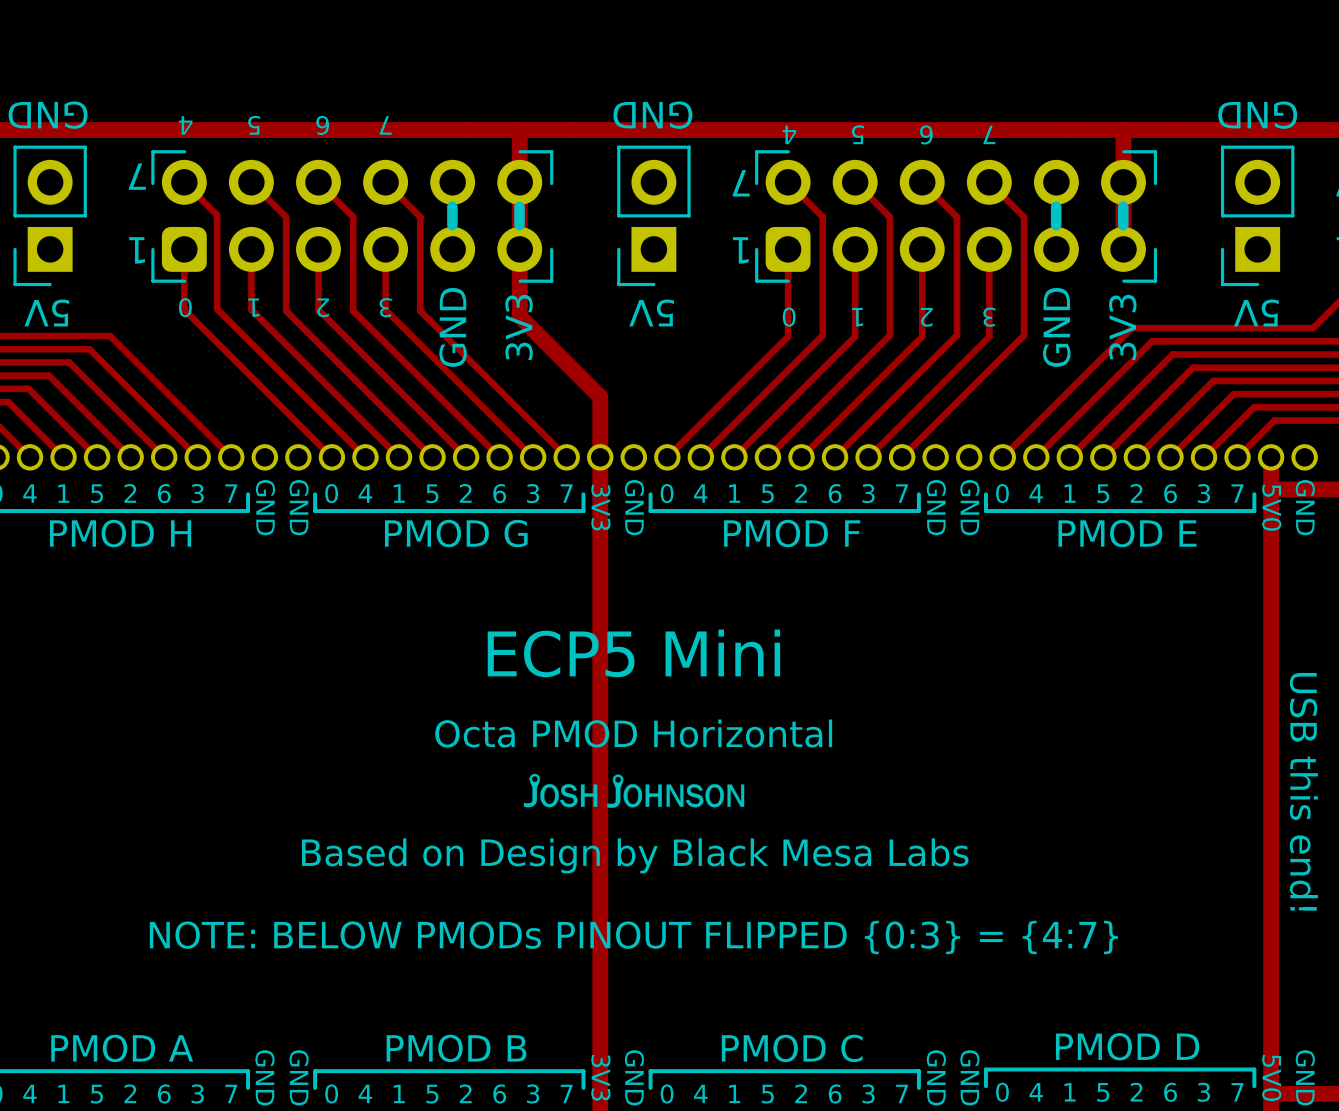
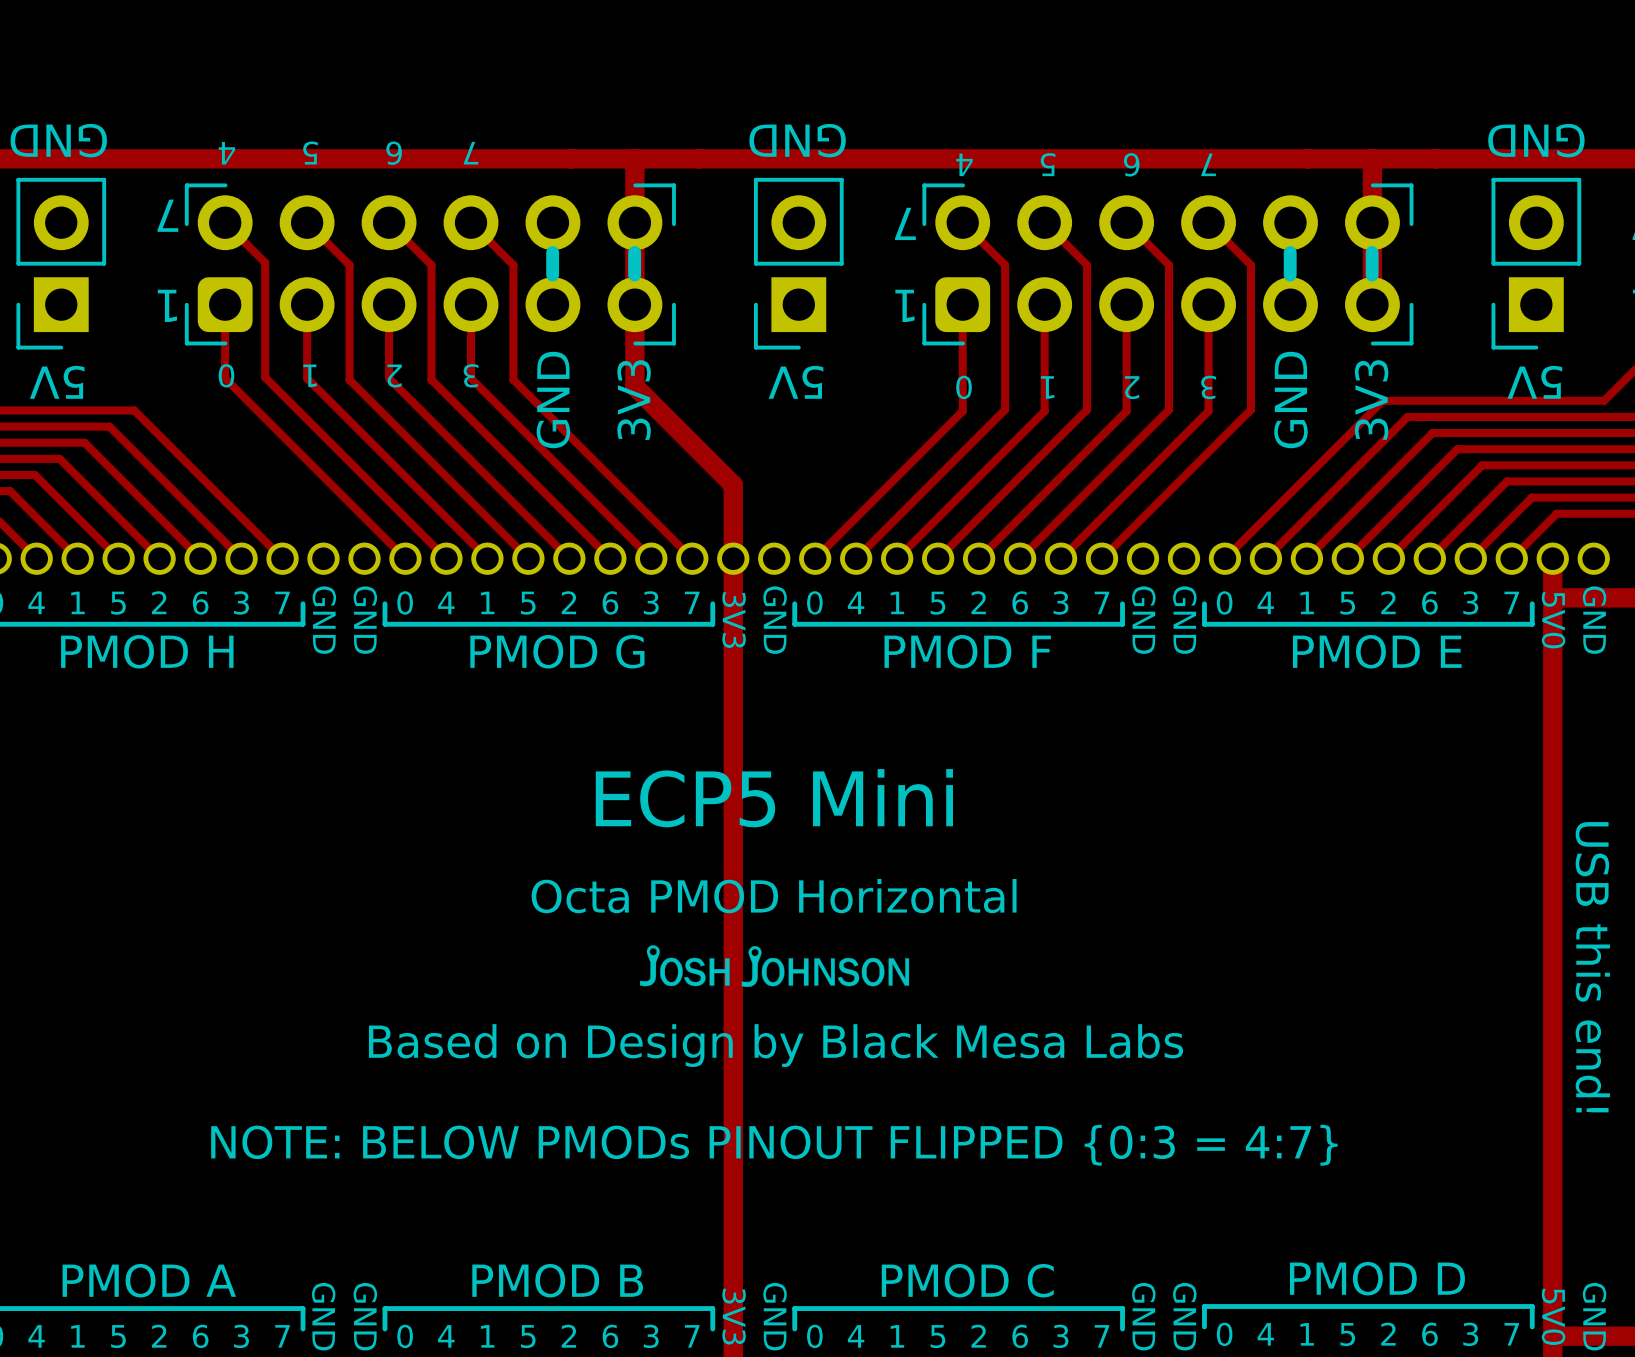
text: NOTE: BELOW PMODs PINOUT FLIPPED {0:3} = {4:7} (633, 937) -> NOTE: BELOW PMODs PINOUT FLIPPED {0:3 = 4:7} (774, 1145)

